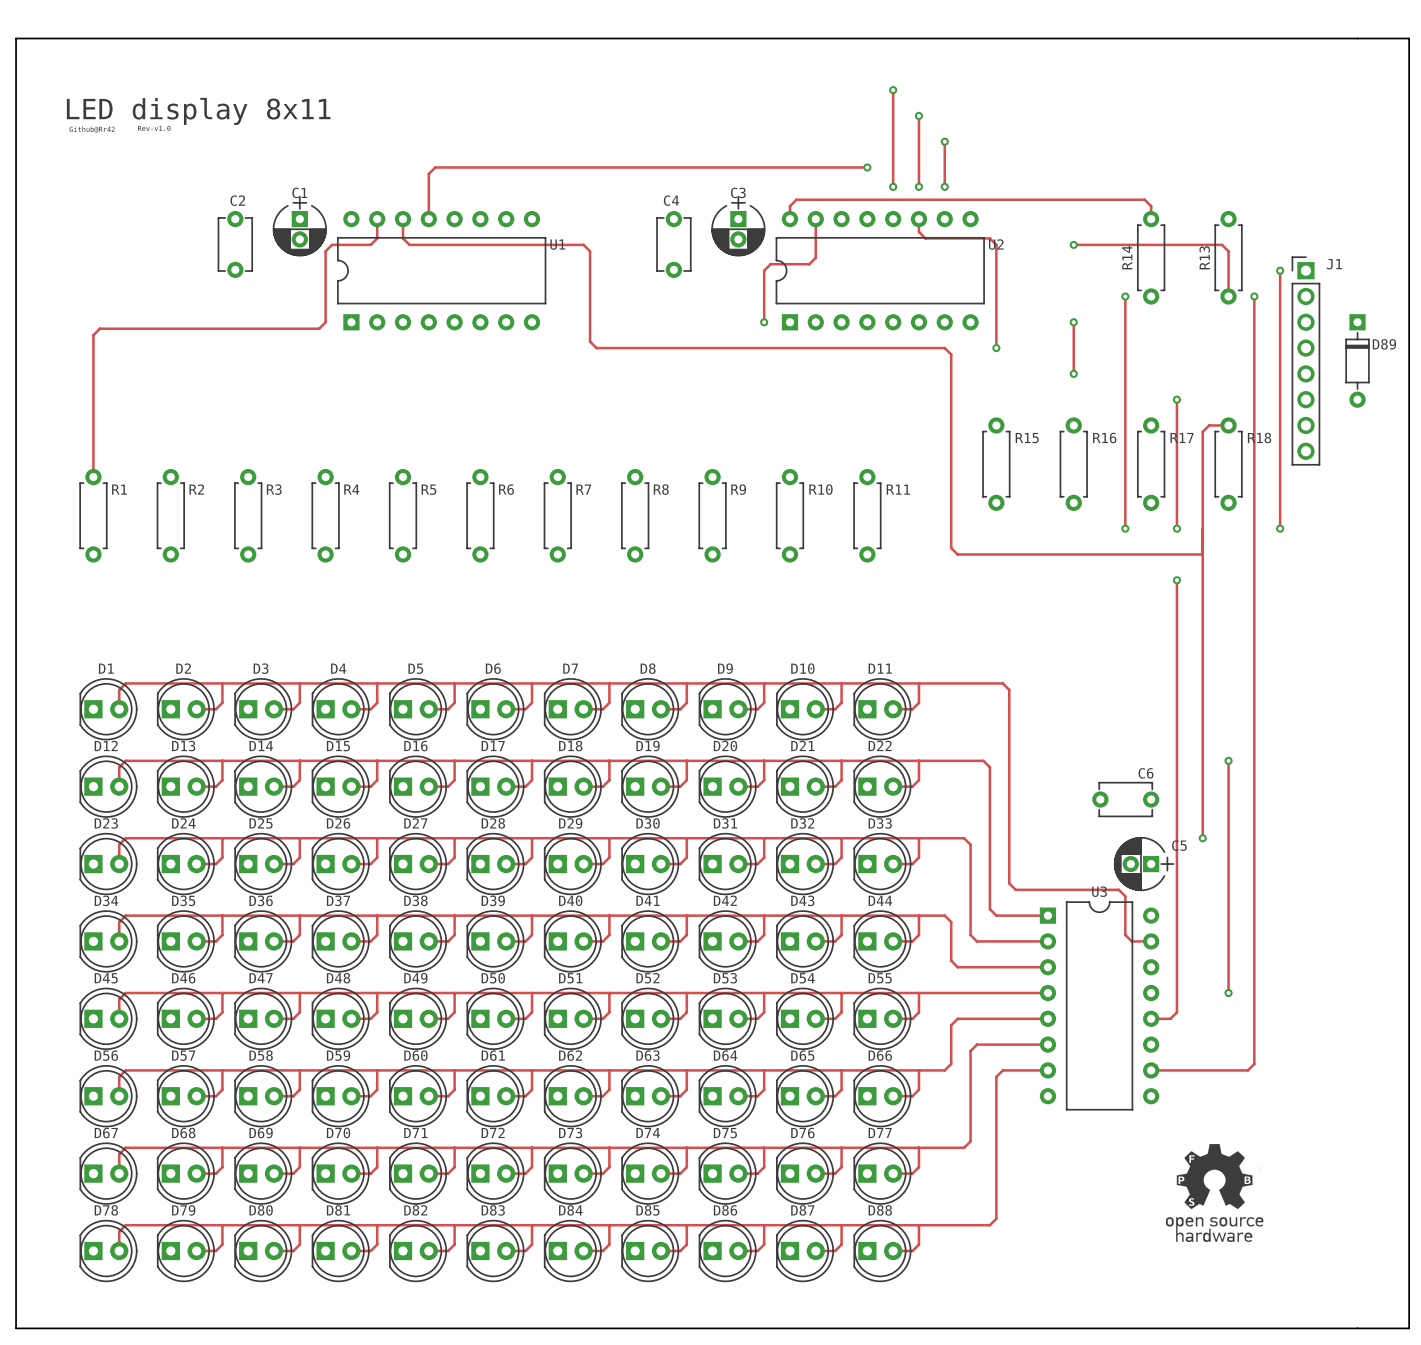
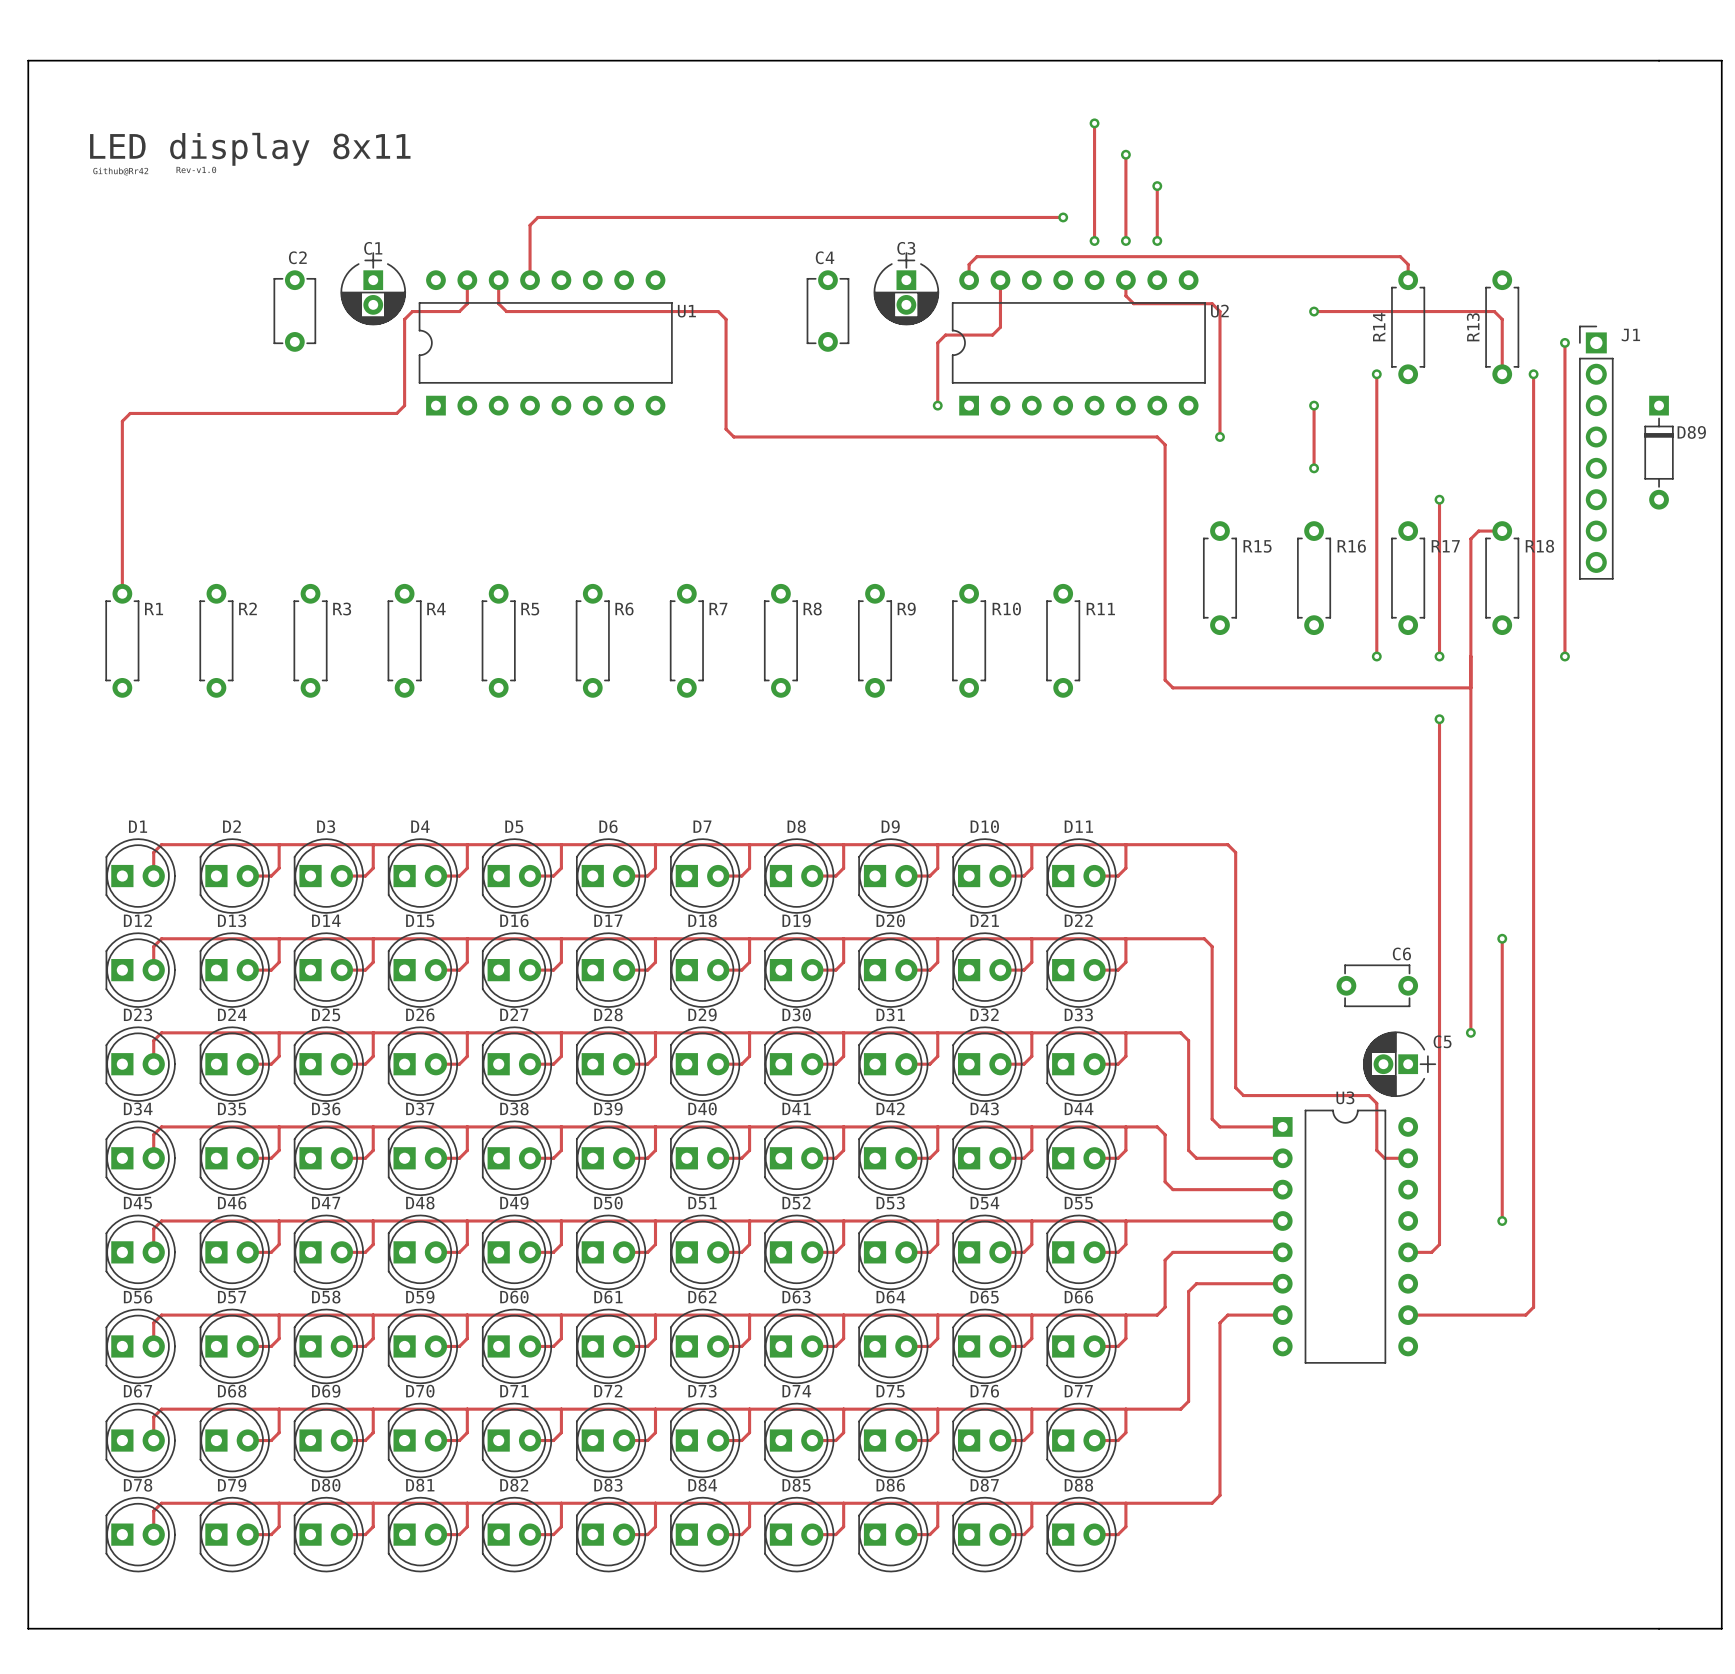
drawing: [1165, 1144, 1264, 1242] -> none

